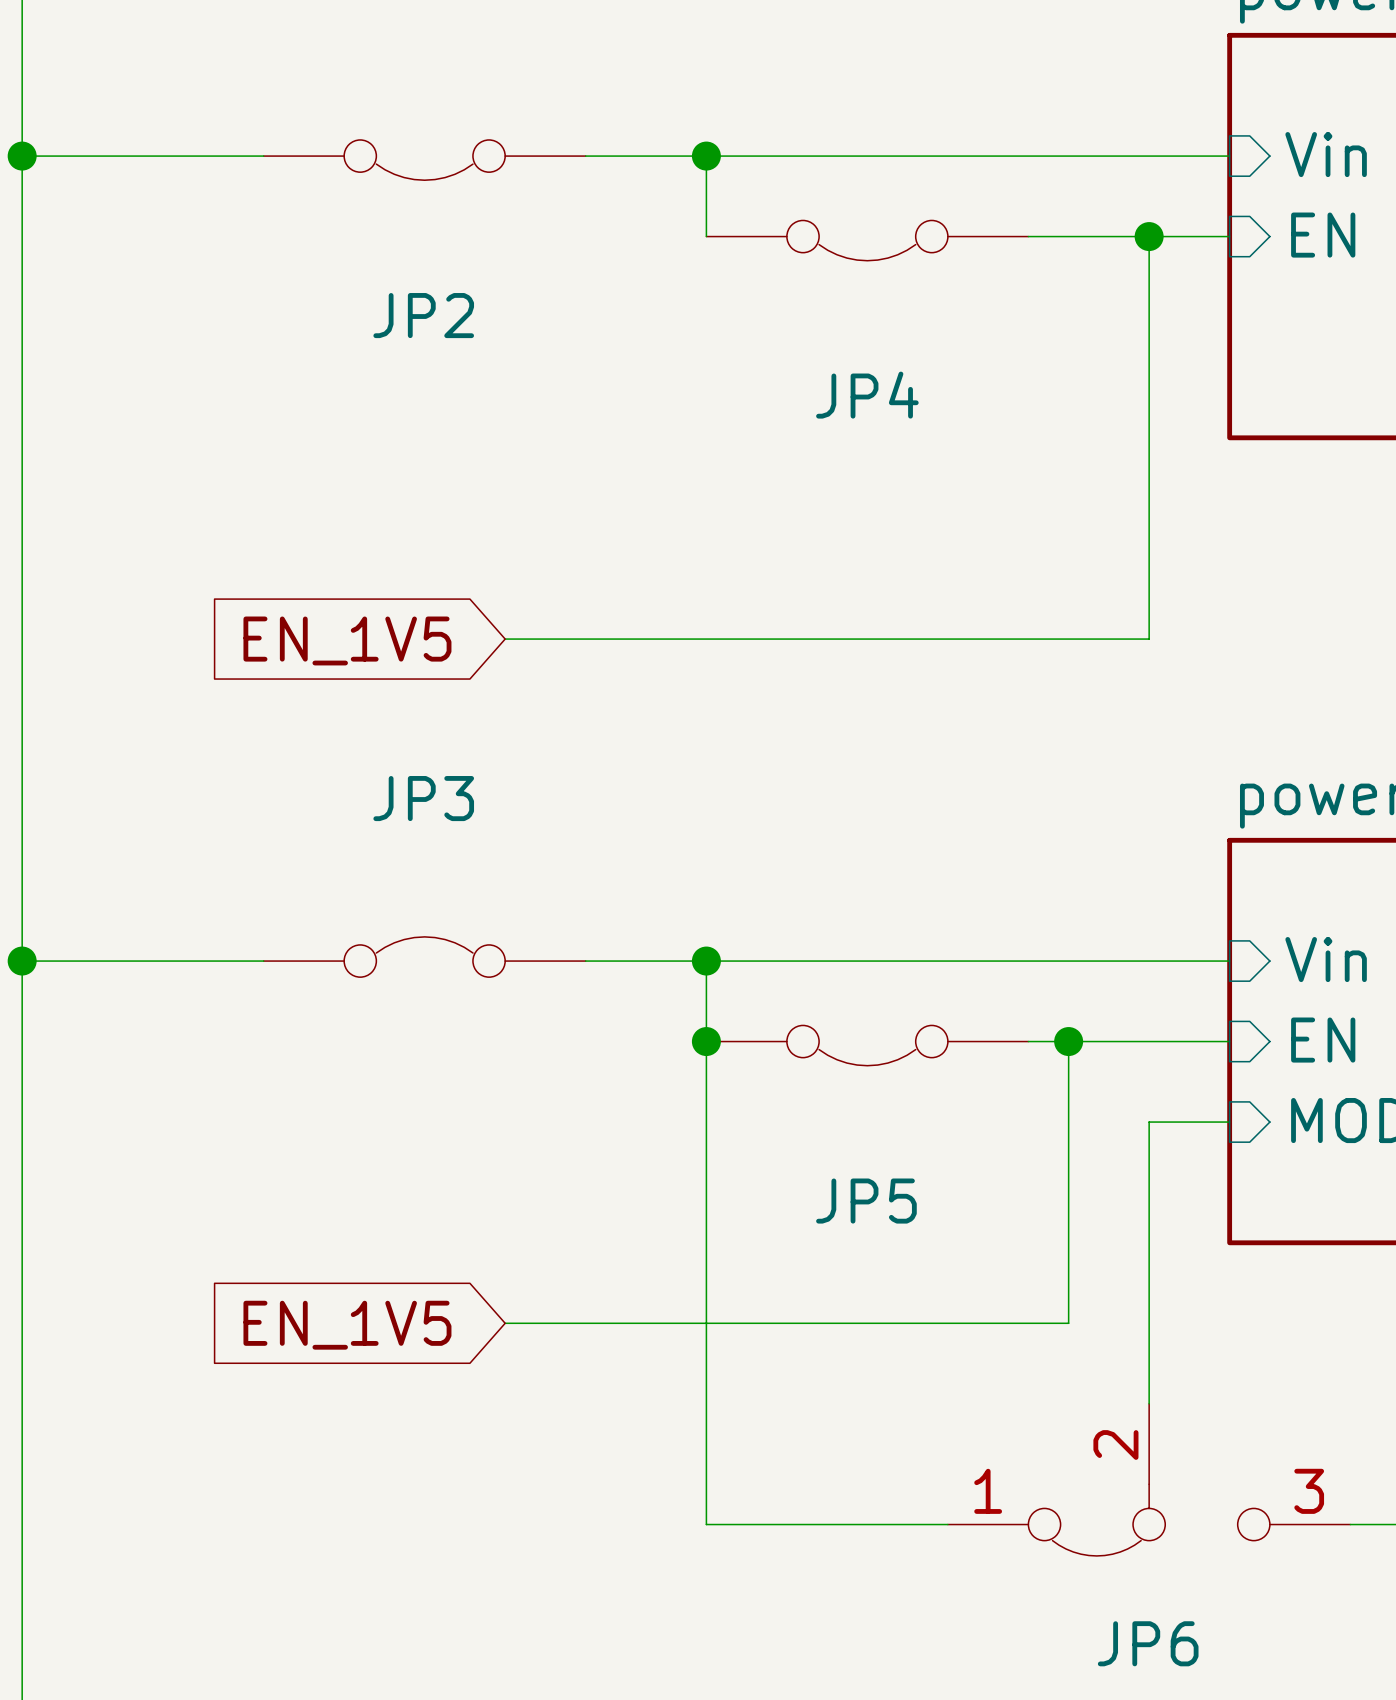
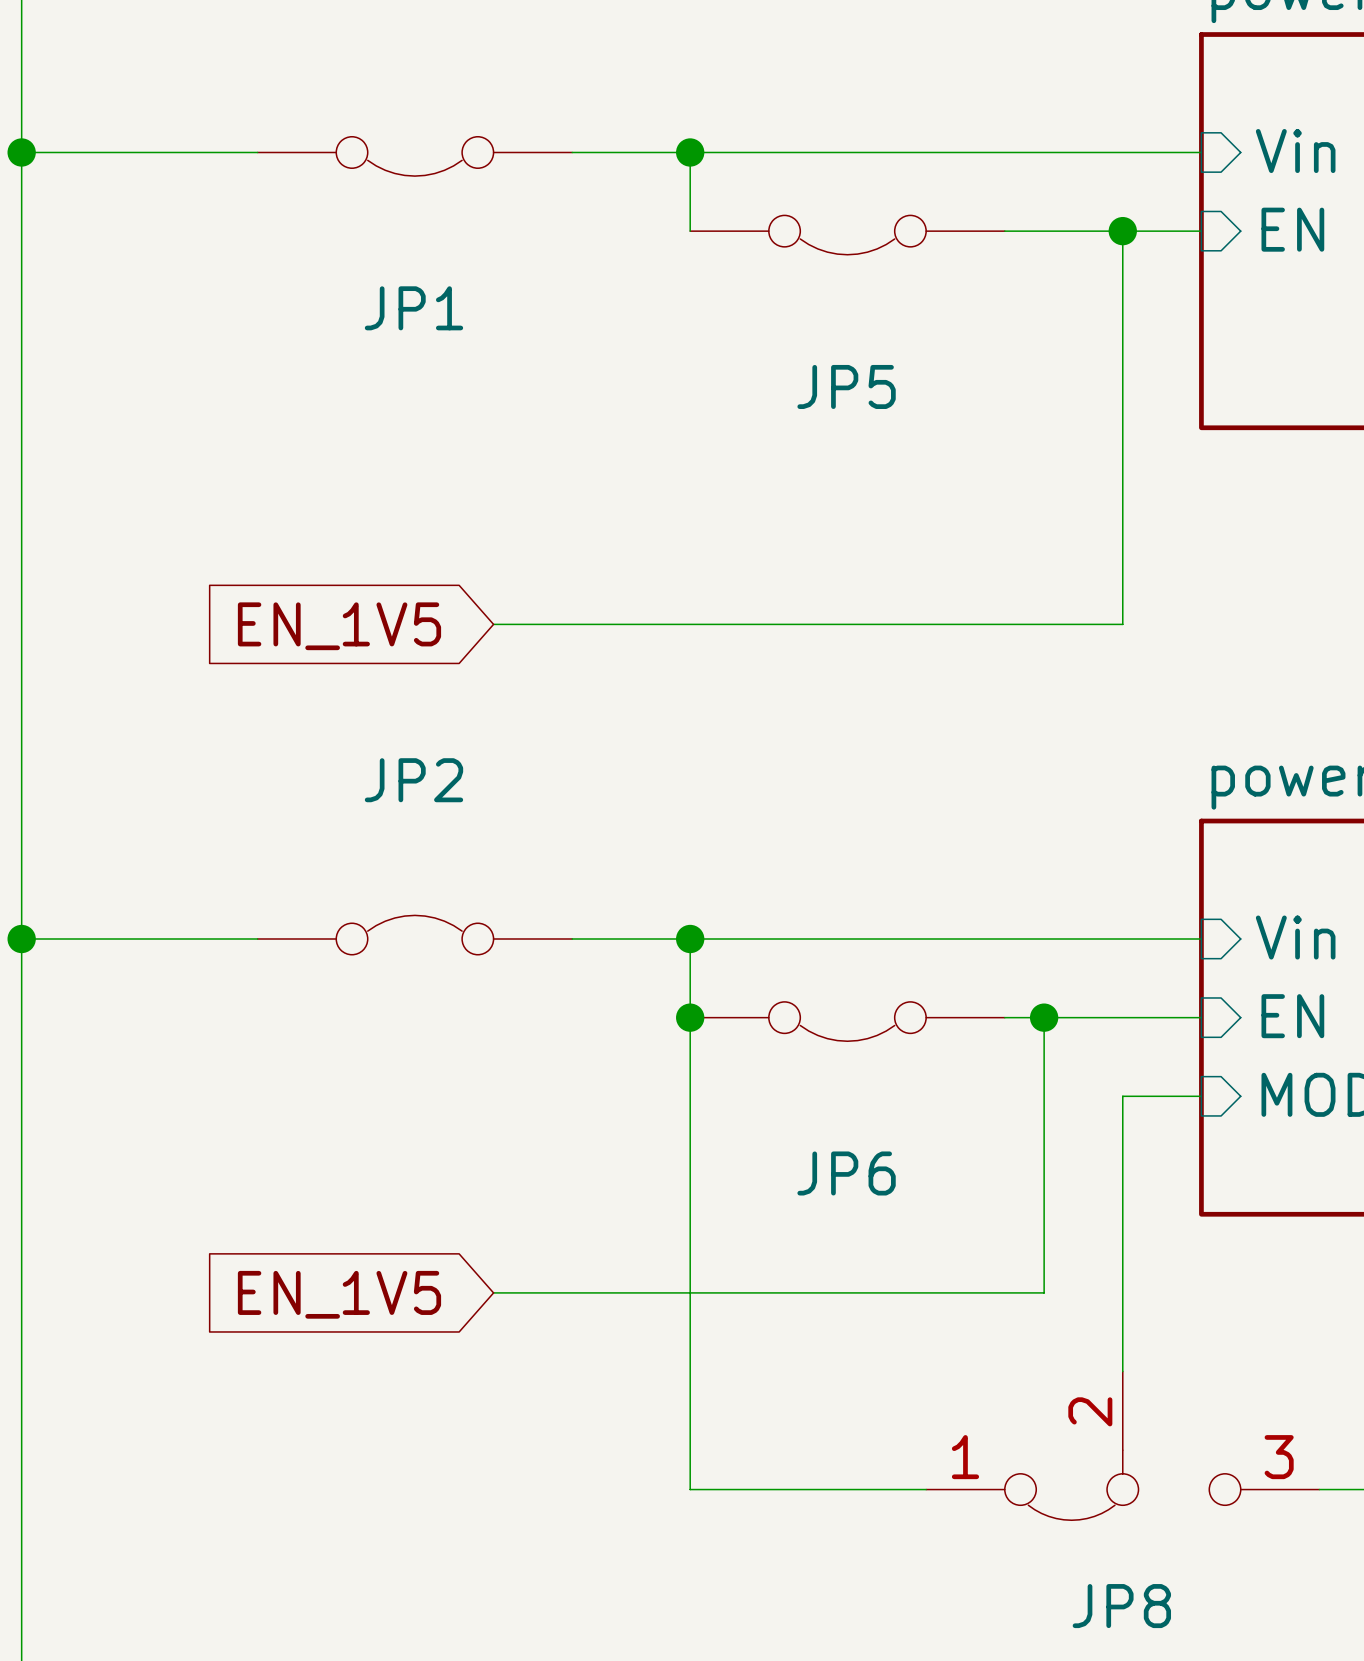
JP2 name: JP2 (423, 315) -> JP1 (413, 308)
JP4 name: JP4 (867, 395) -> JP5 (846, 386)
JP3 name: JP3 (423, 798) -> JP2 (413, 780)
JP5 name: JP5 (866, 1201) -> JP6 (846, 1173)
JP6 name: JP6 (1148, 1643) -> JP8 (1121, 1606)

